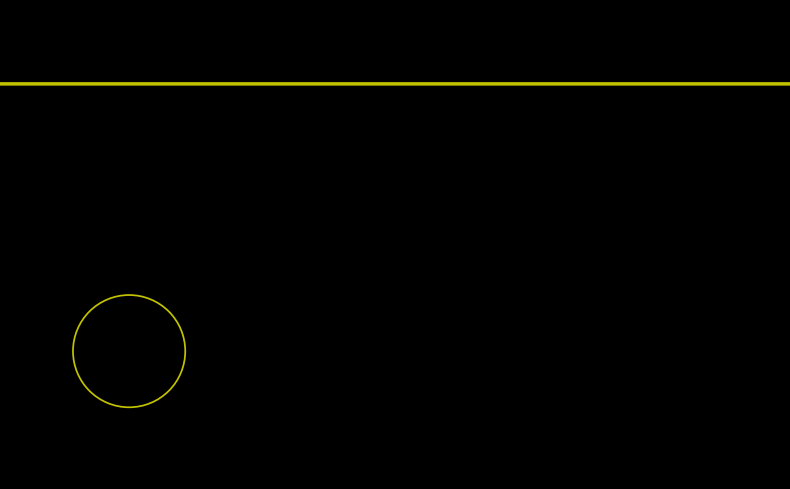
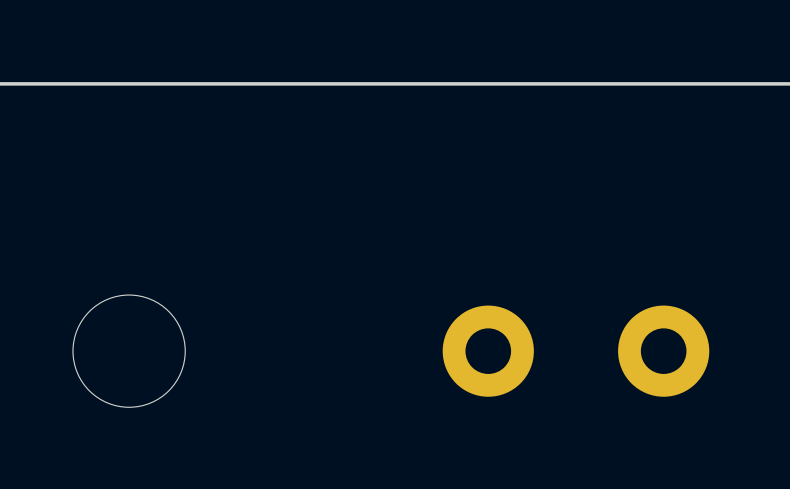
part: none -> (575, 351)

